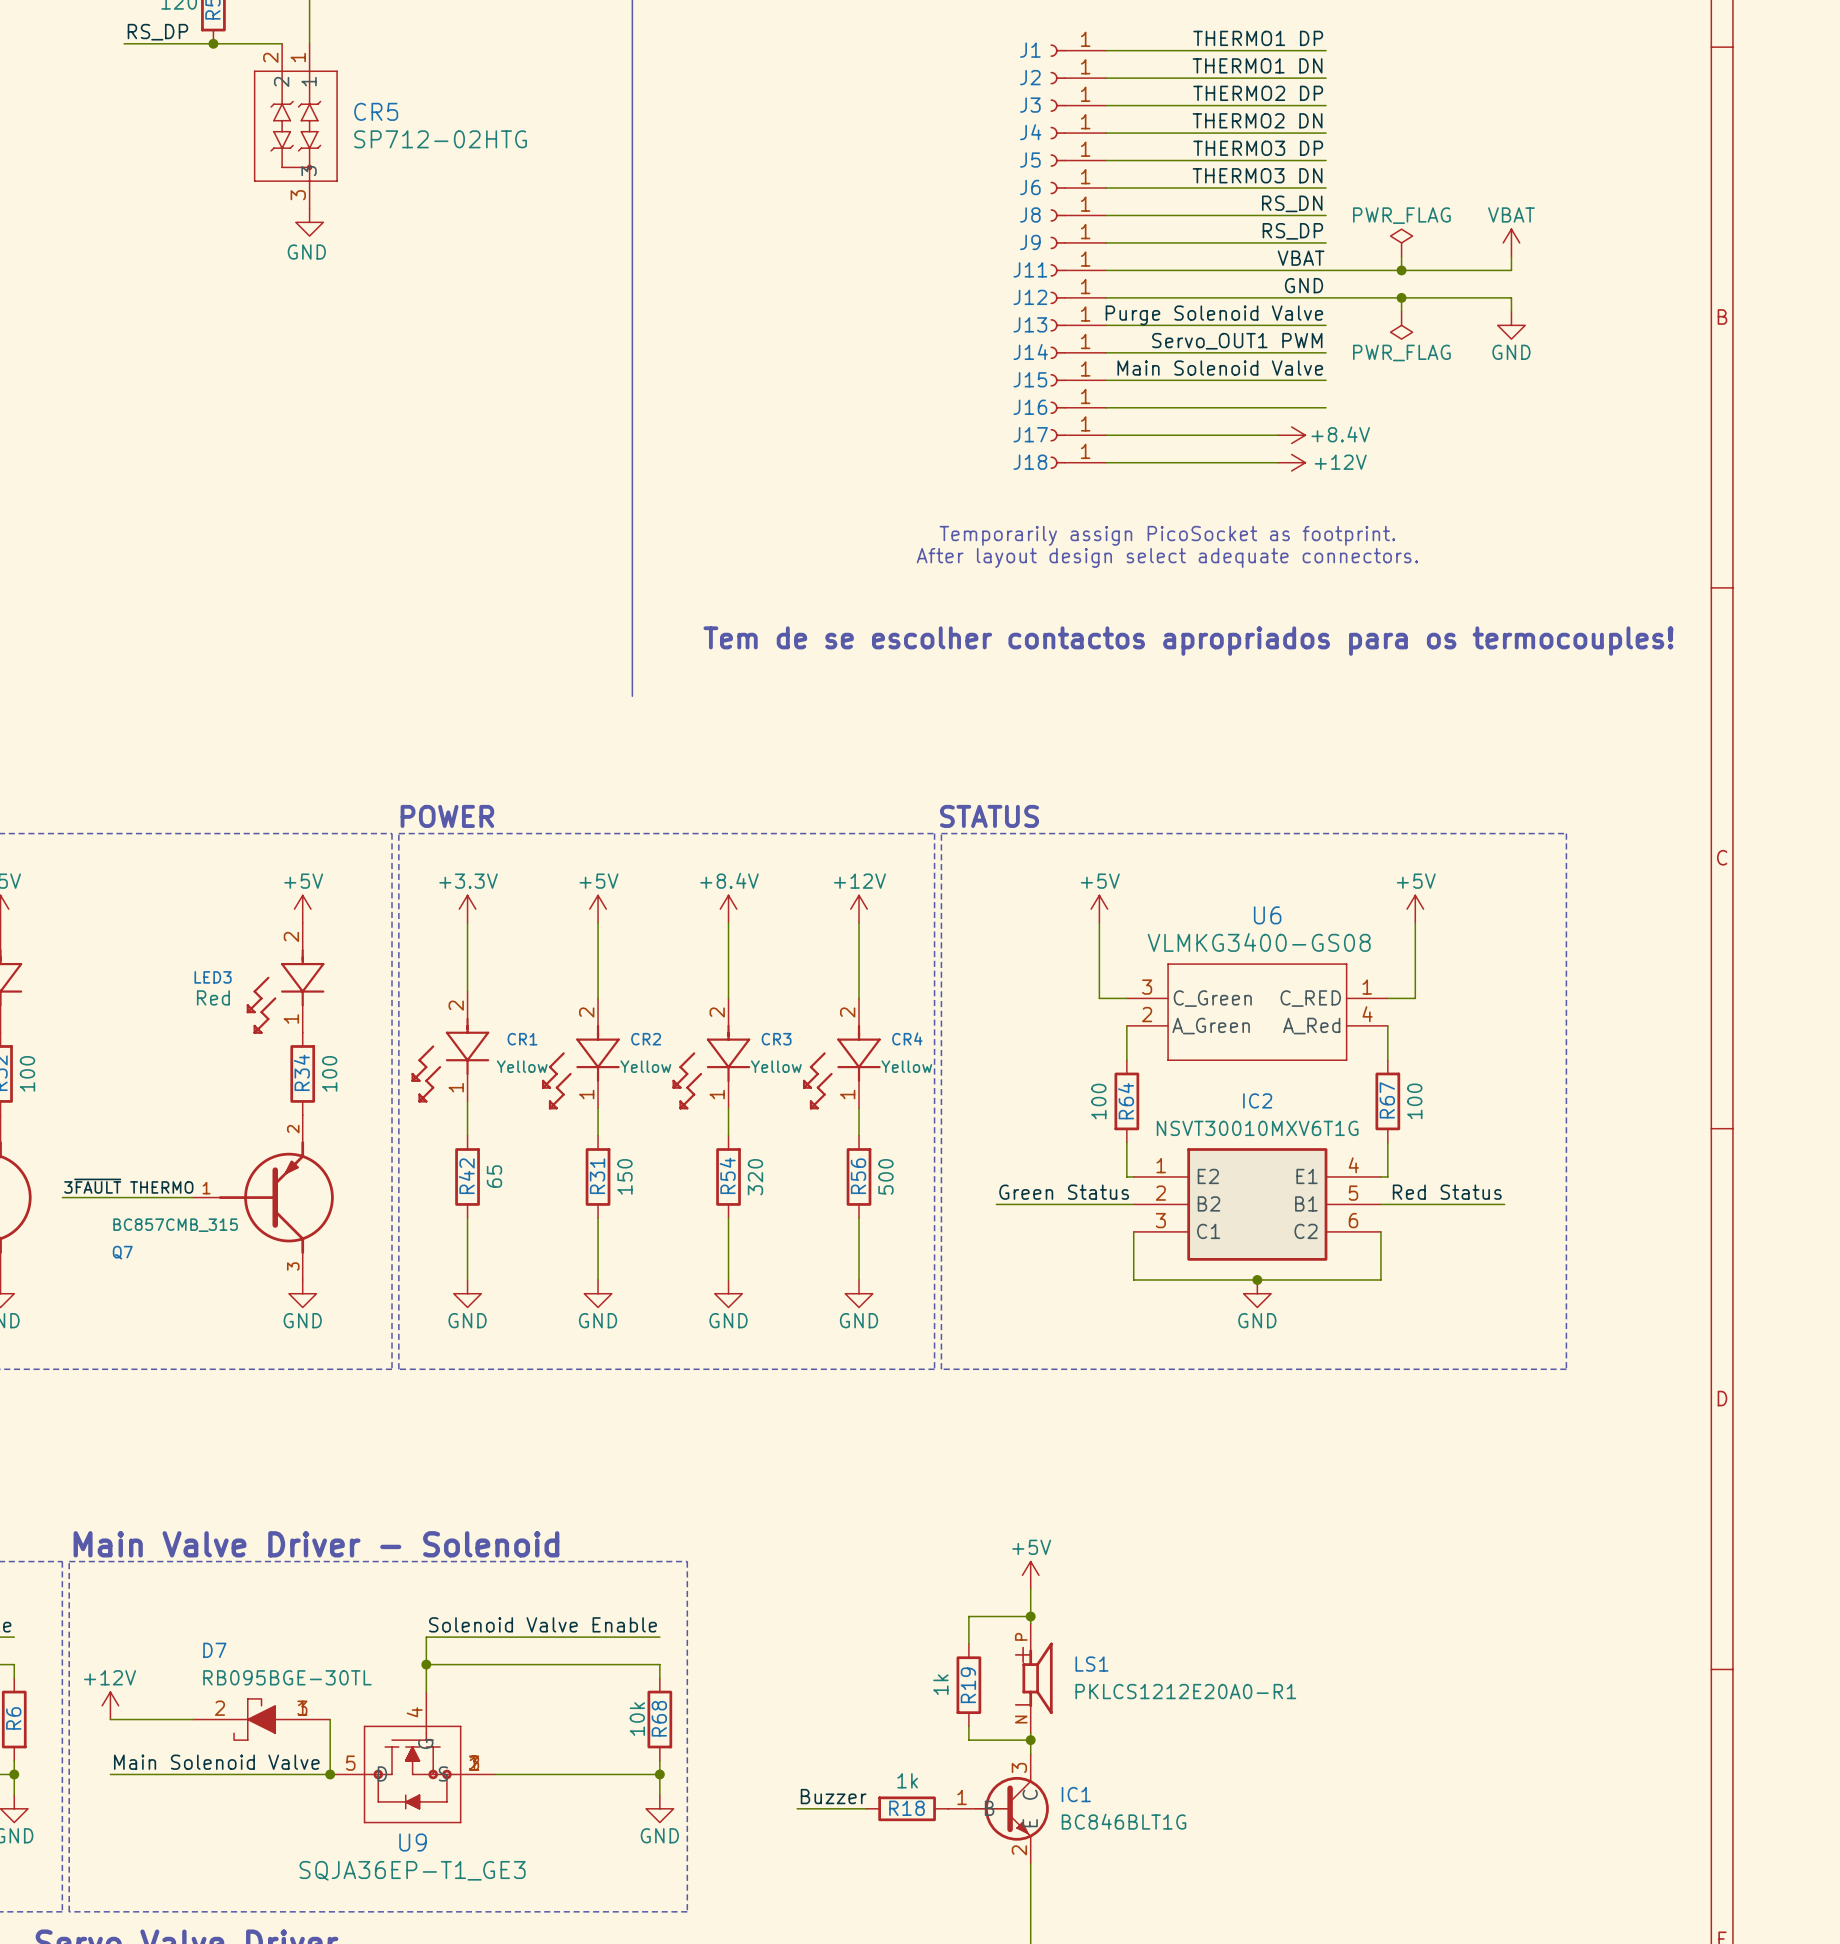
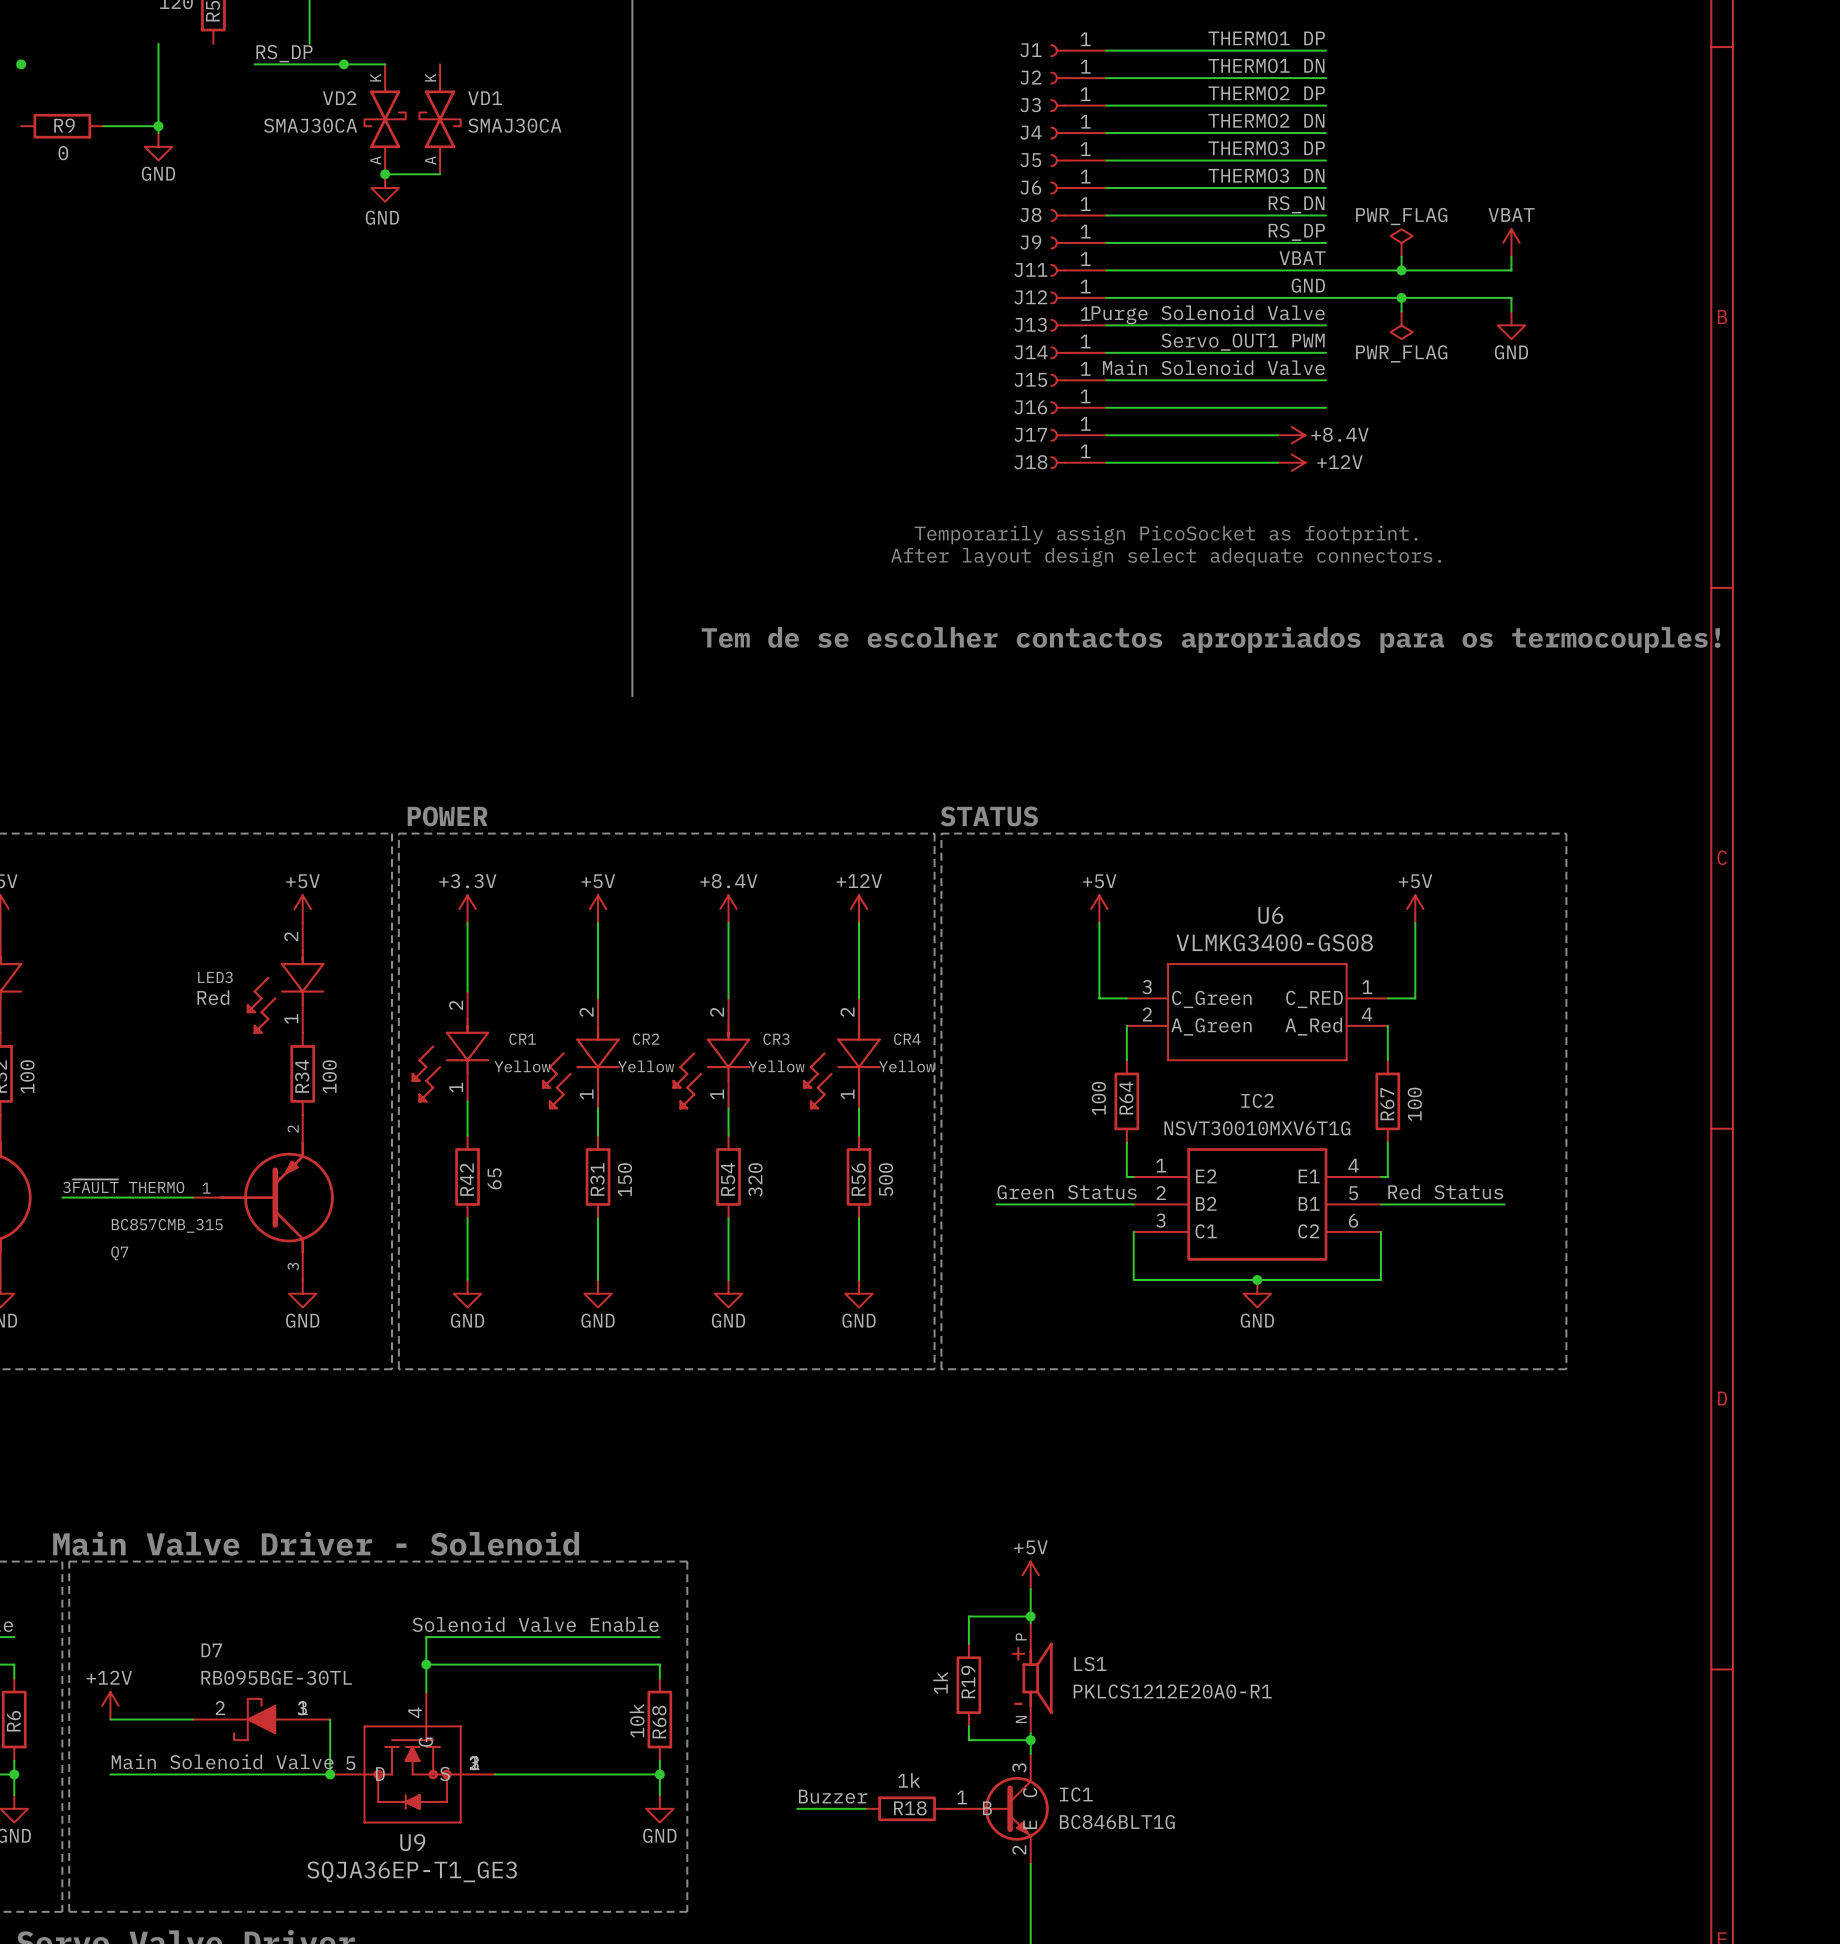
label: RS_DP (157, 32) -> none
wire: (124, 43) (282, 43) -> none
wire: none -> (158, 43) (158, 133)
junction: (213, 43) -> none
label: none -> RS_DP (284, 53)
junction: none -> (21, 64)
wire: none -> (254, 64) (385, 64)
junction: none -> (343, 64)
VD2: none -> SMAJ30CA (385, 119)
VD1: none -> SMAJ30CA (440, 119)
R9: none -> 0 (62, 126)
wire: none -> (103, 126) (158, 126)
junction: none -> (158, 126)
CR5: SP712-02HTG (295, 126) -> none
power symbol: none -> GND (158, 146)
wire: none -> (385, 174) (440, 174)
junction: none -> (385, 174)
power symbol position: GND (309, 222) -> GND (385, 188)

